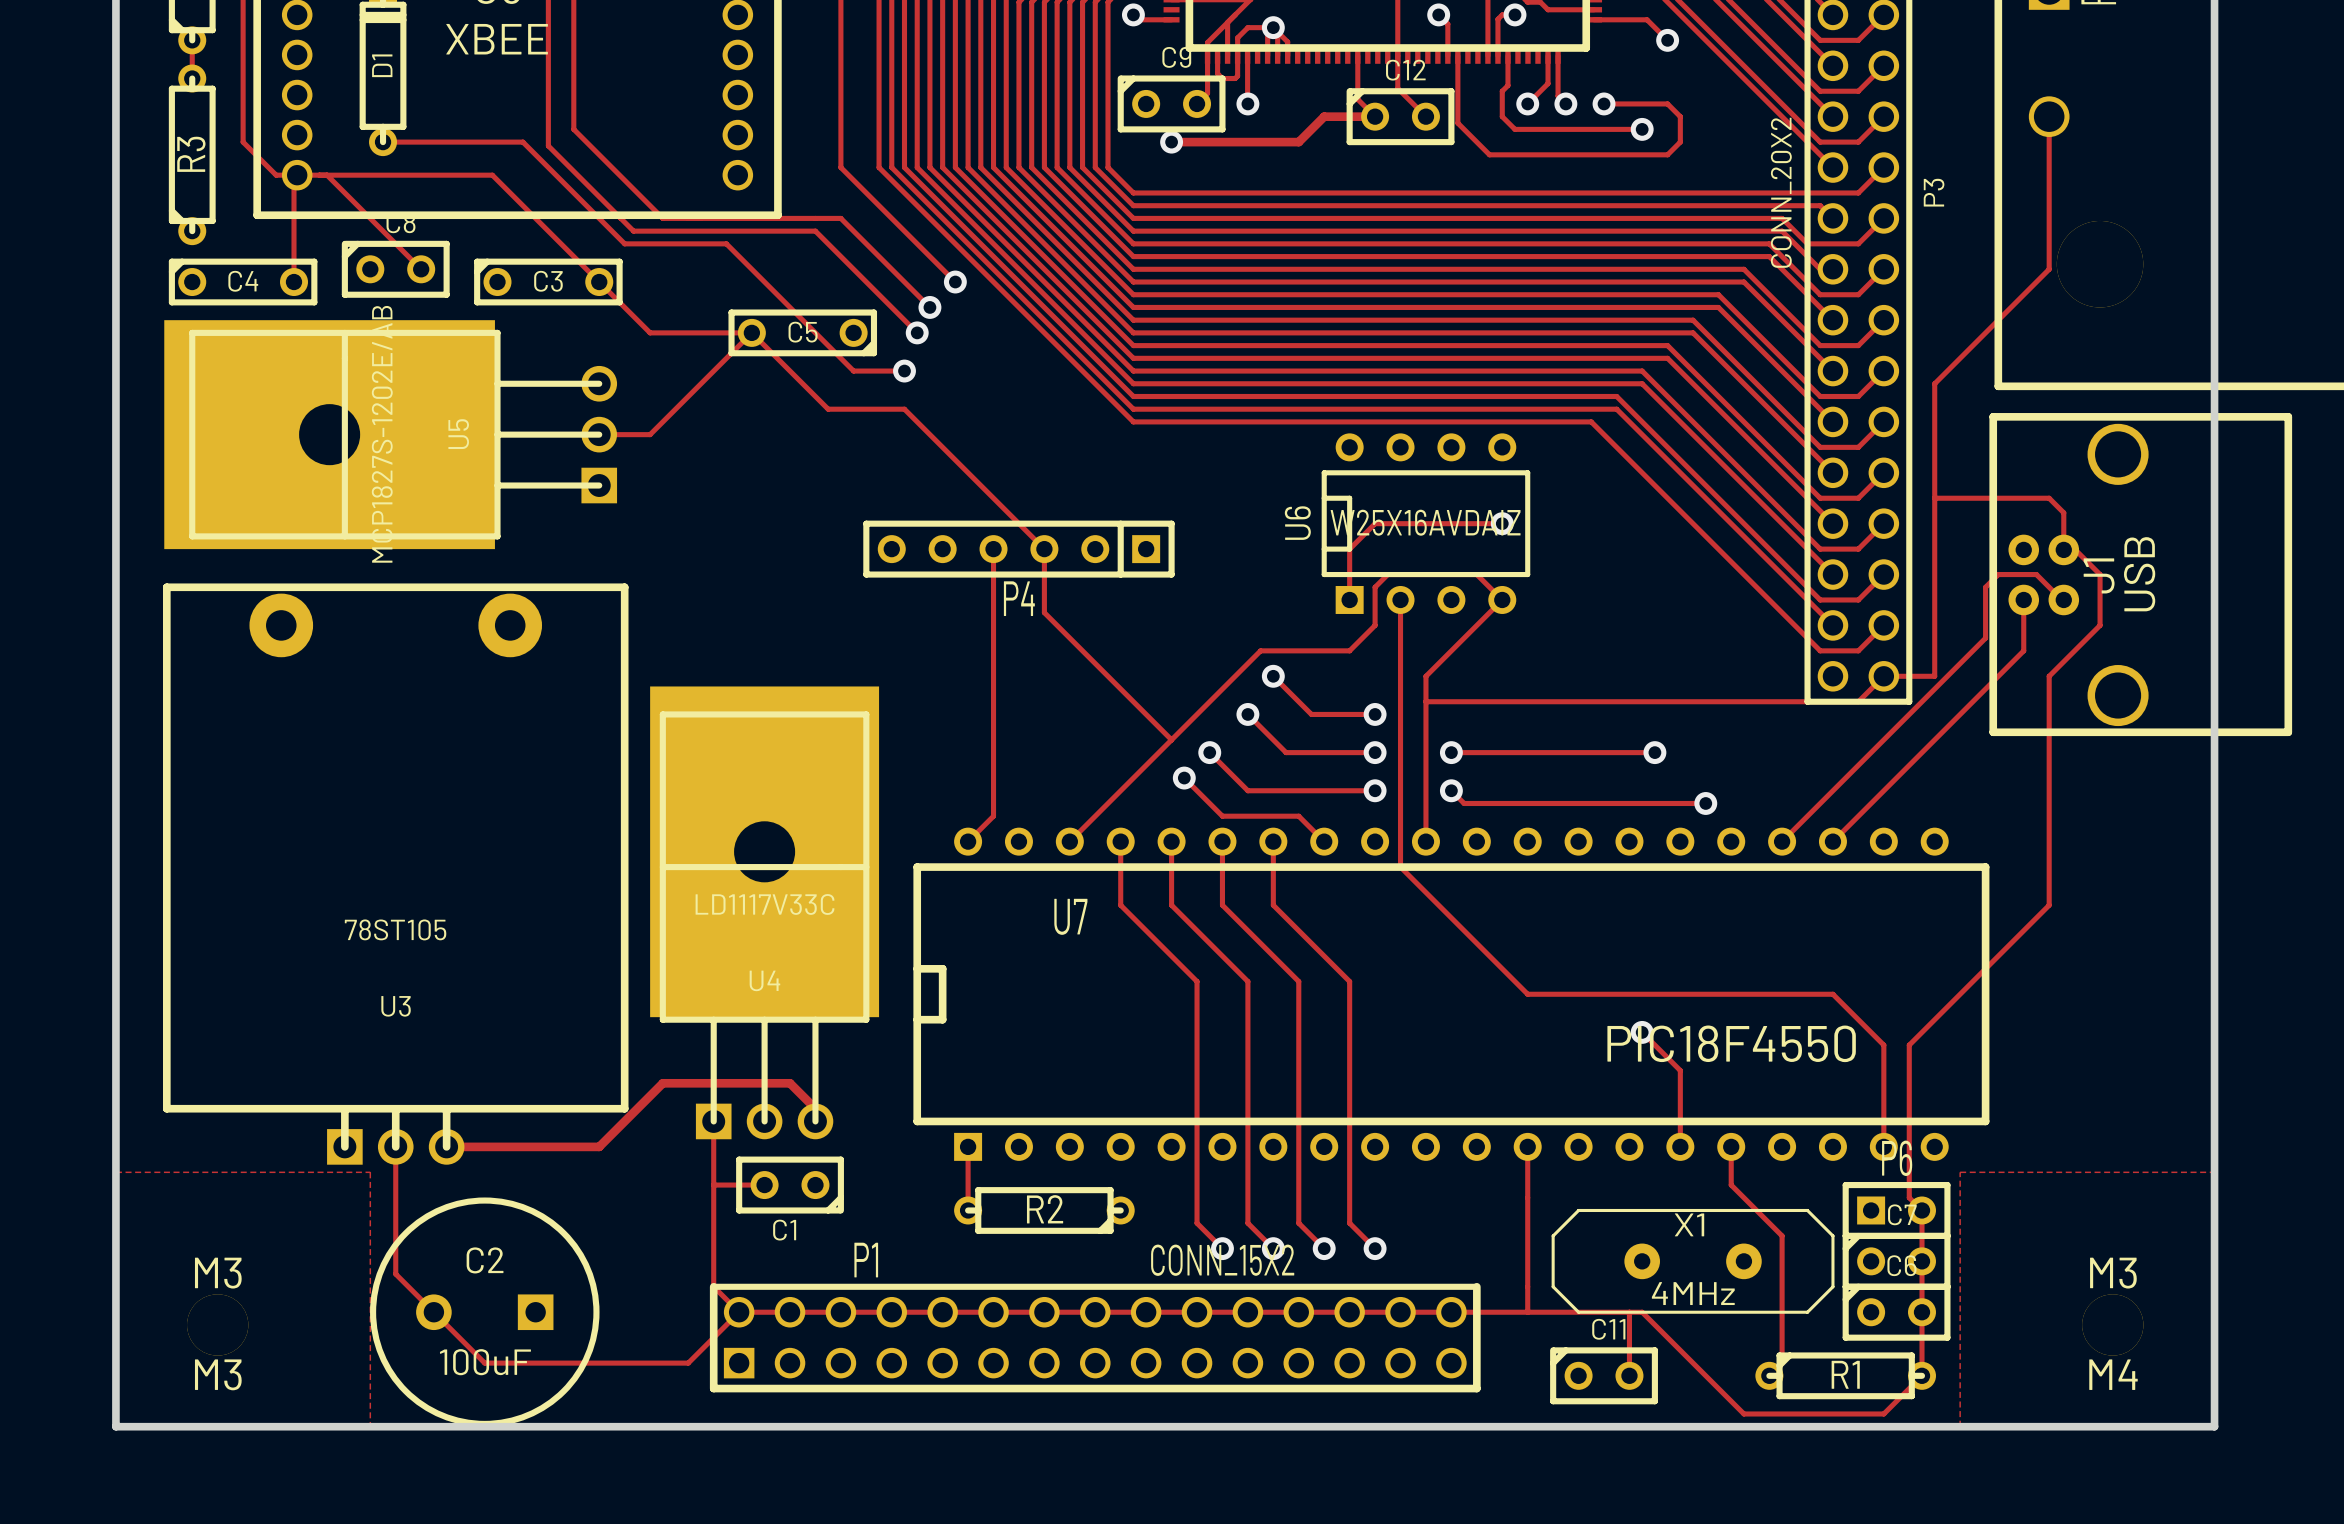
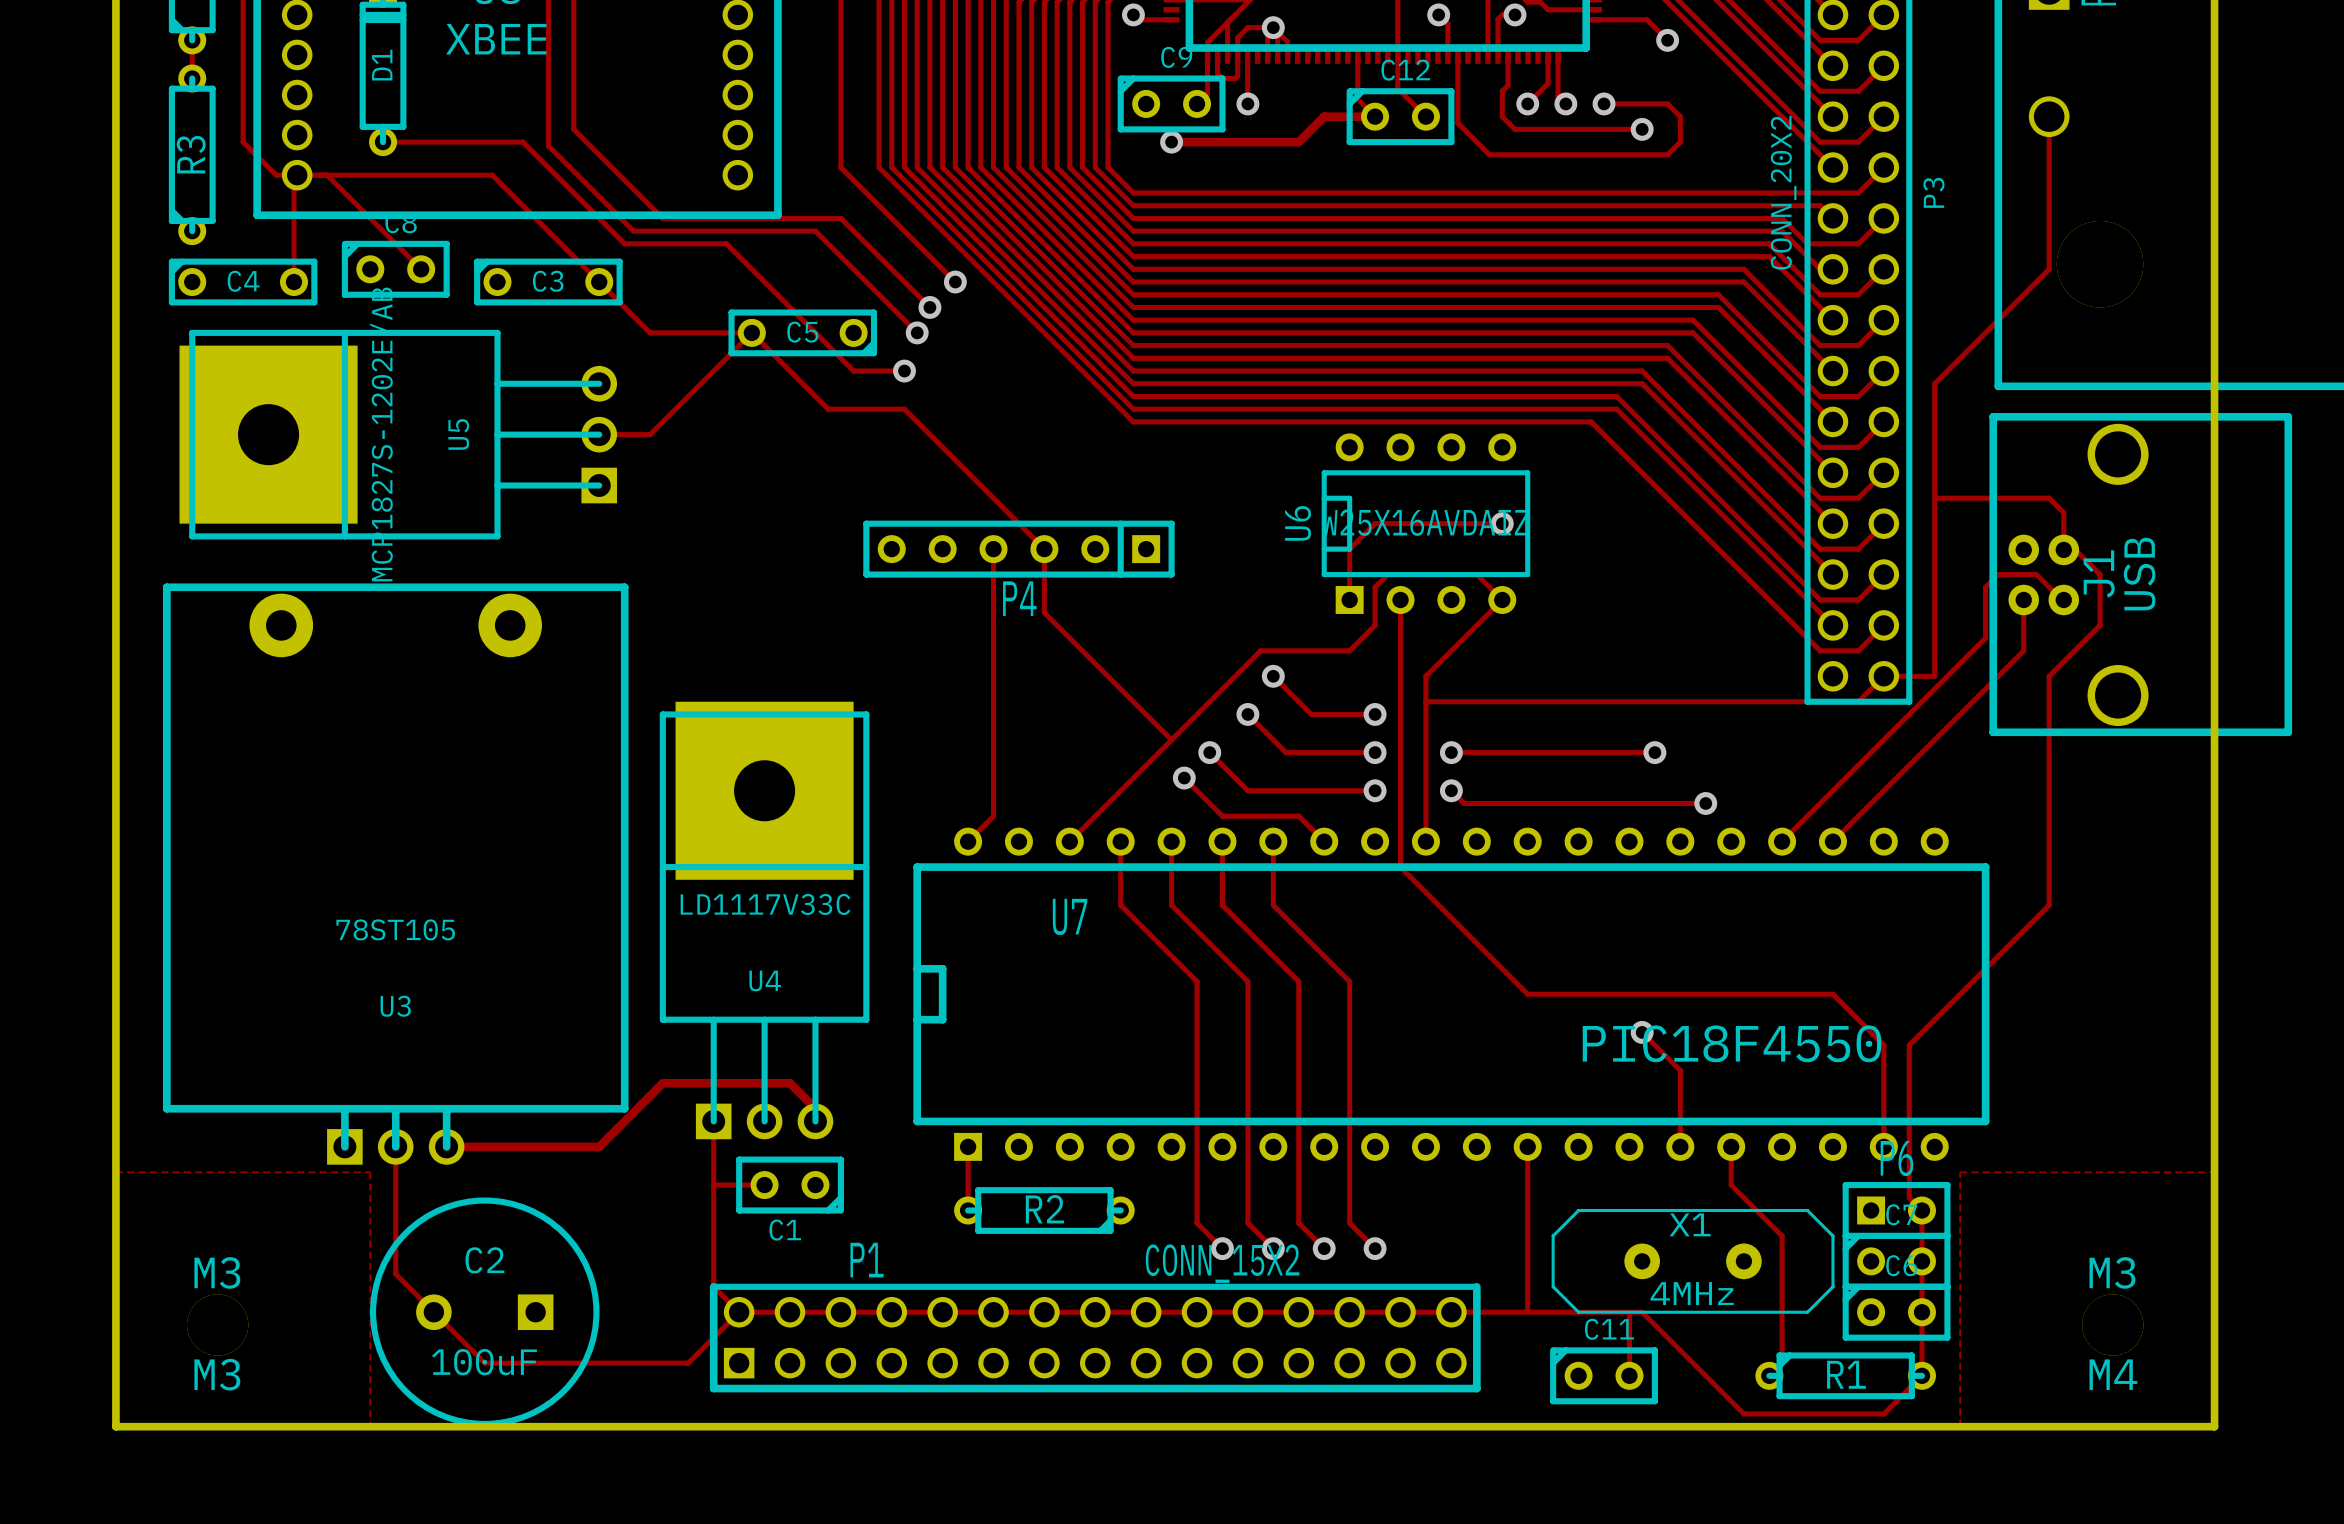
U5 footprint: [164, 320, 618, 550] -> [179, 329, 618, 540]
U4 footprint: [650, 686, 880, 1140] -> [659, 701, 870, 1140]

